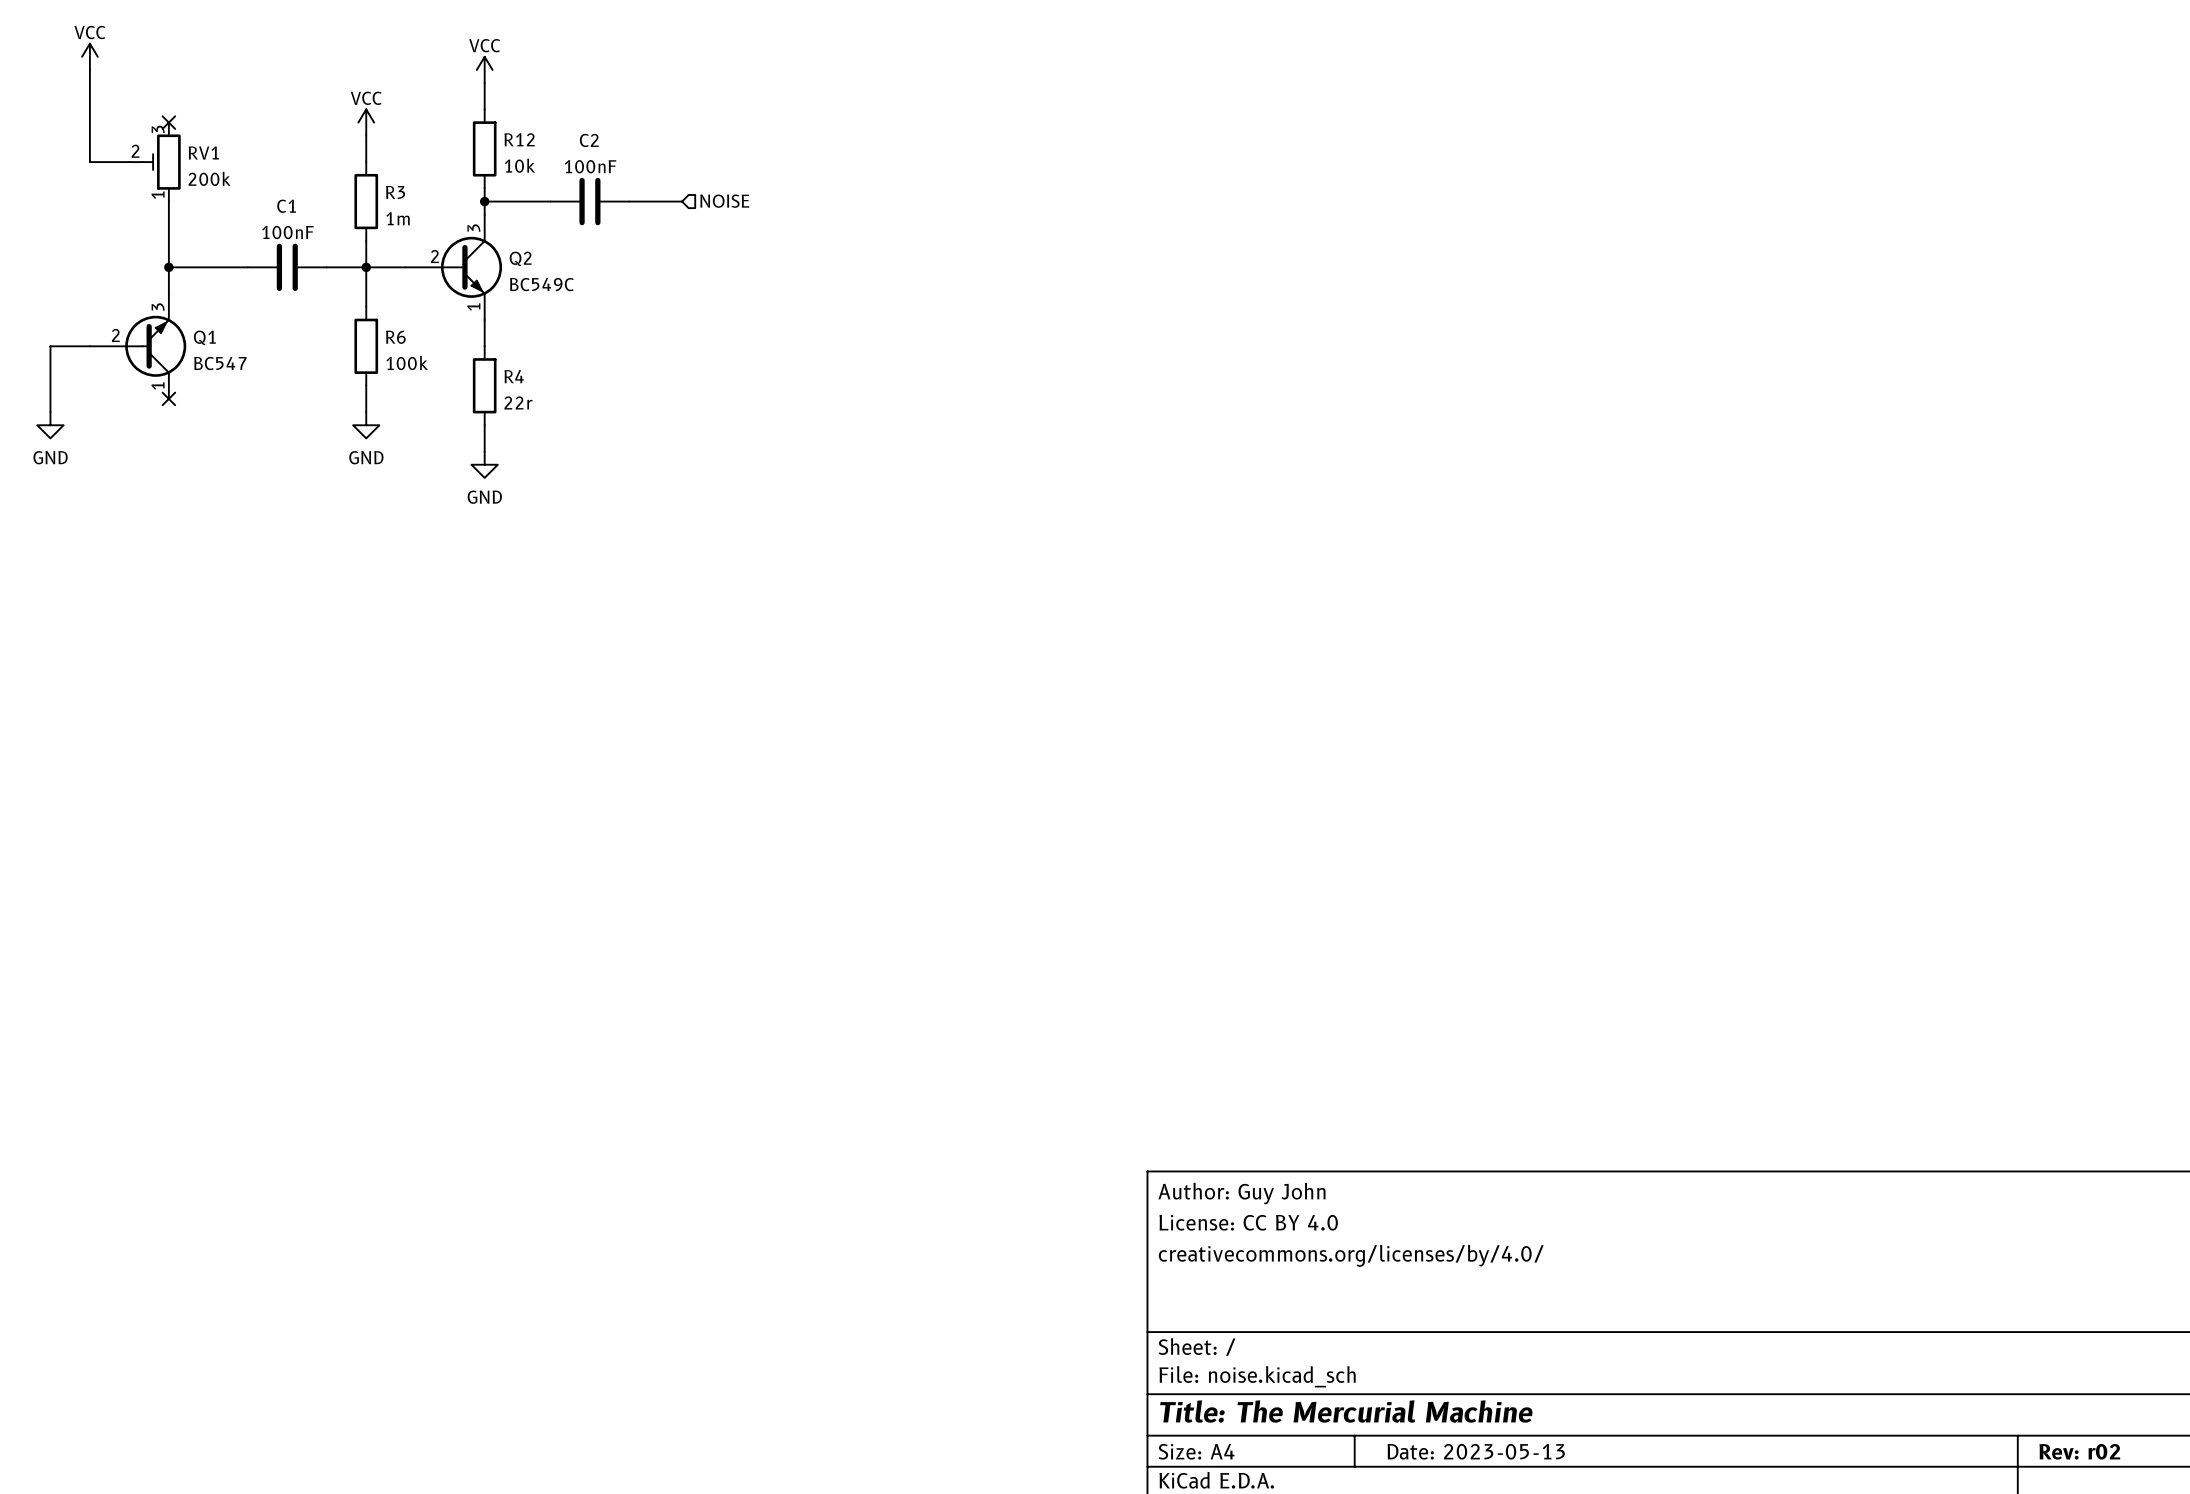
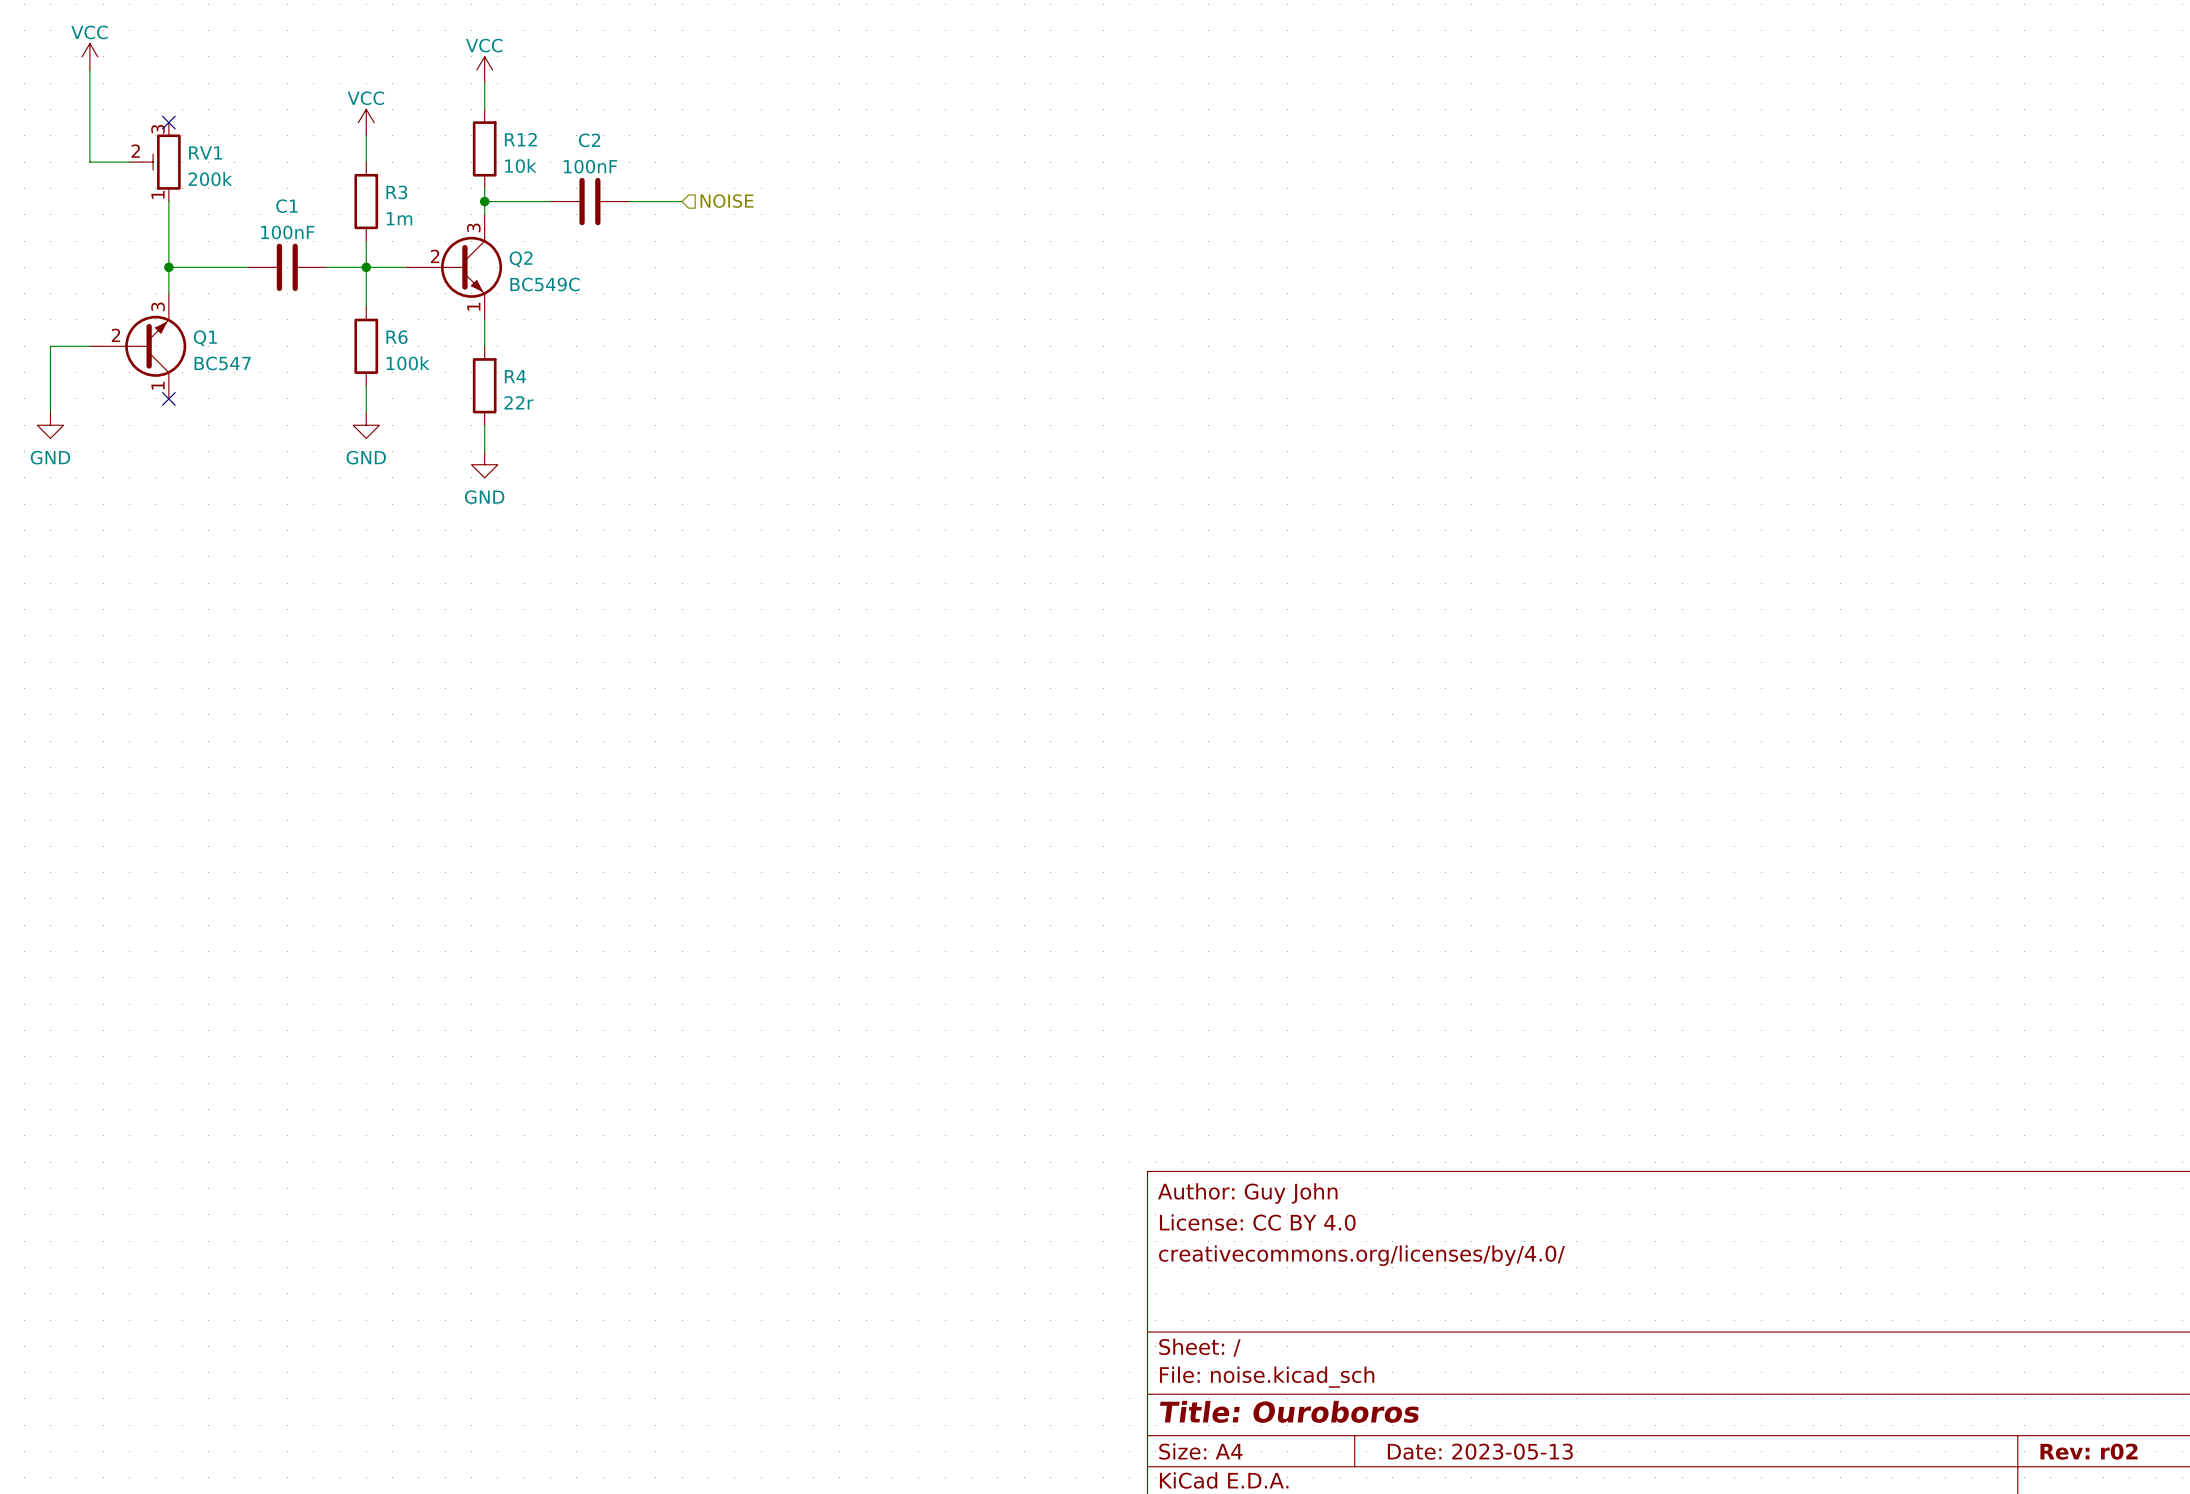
title block: Title: The Mercurial Machine (1346, 1411) -> Title: Ouroboros (1289, 1411)

